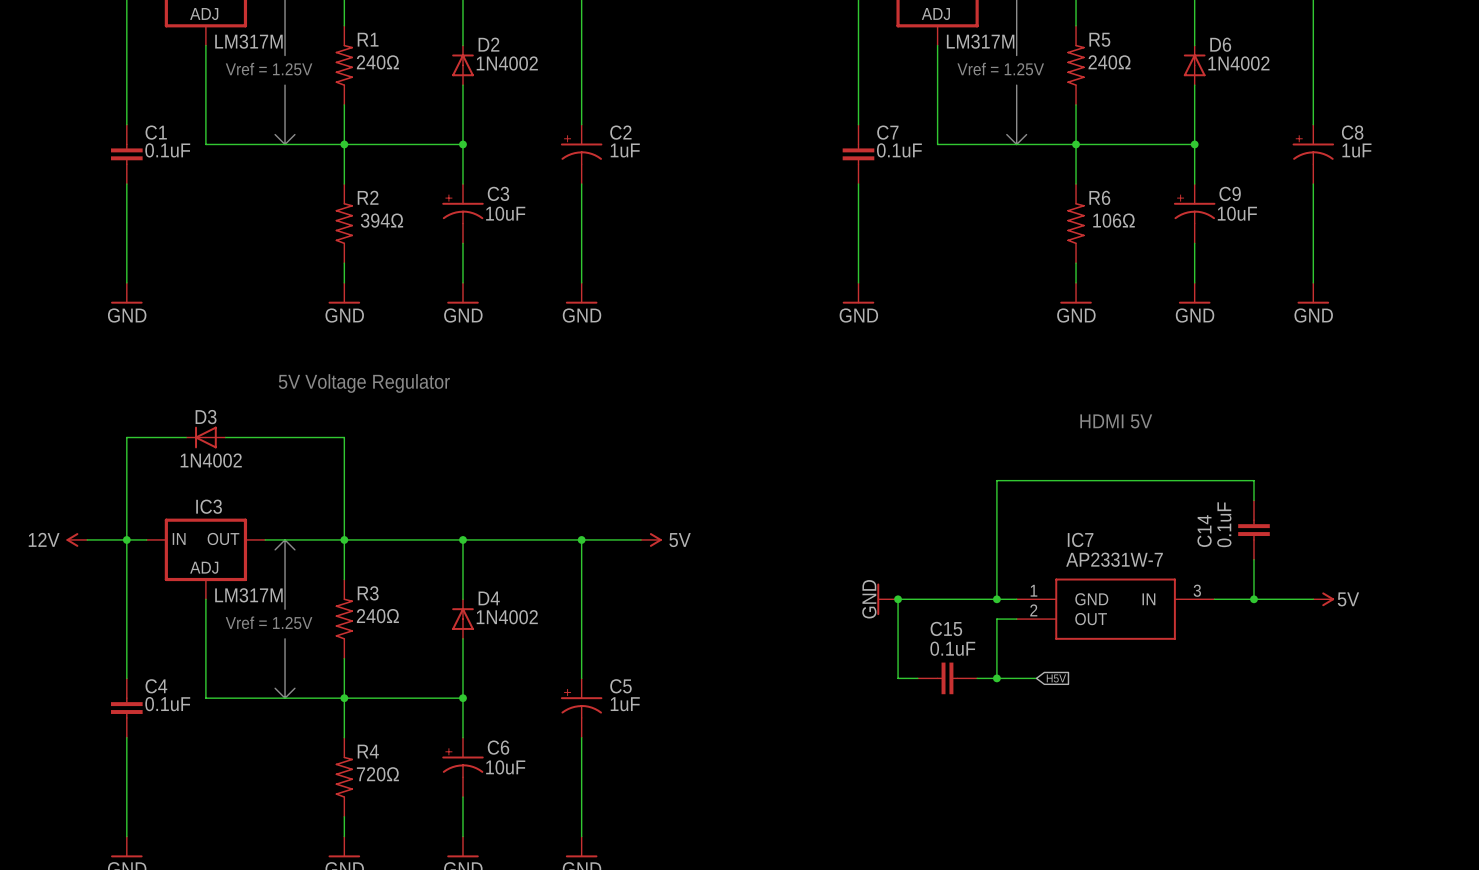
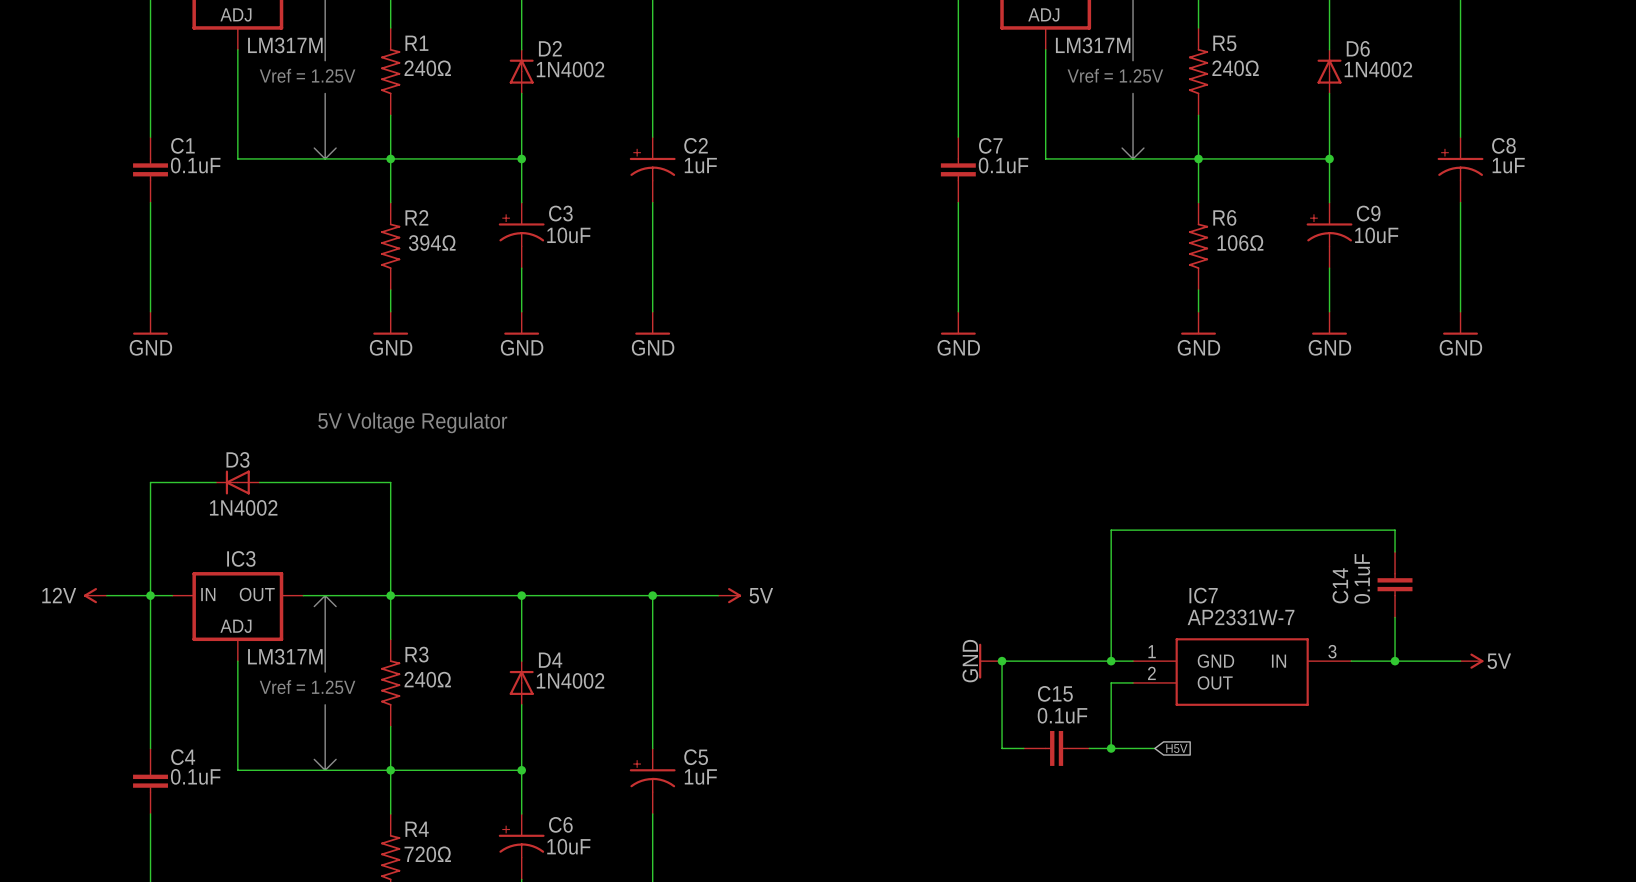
text: HDMI 5V (1116, 421) -> none

